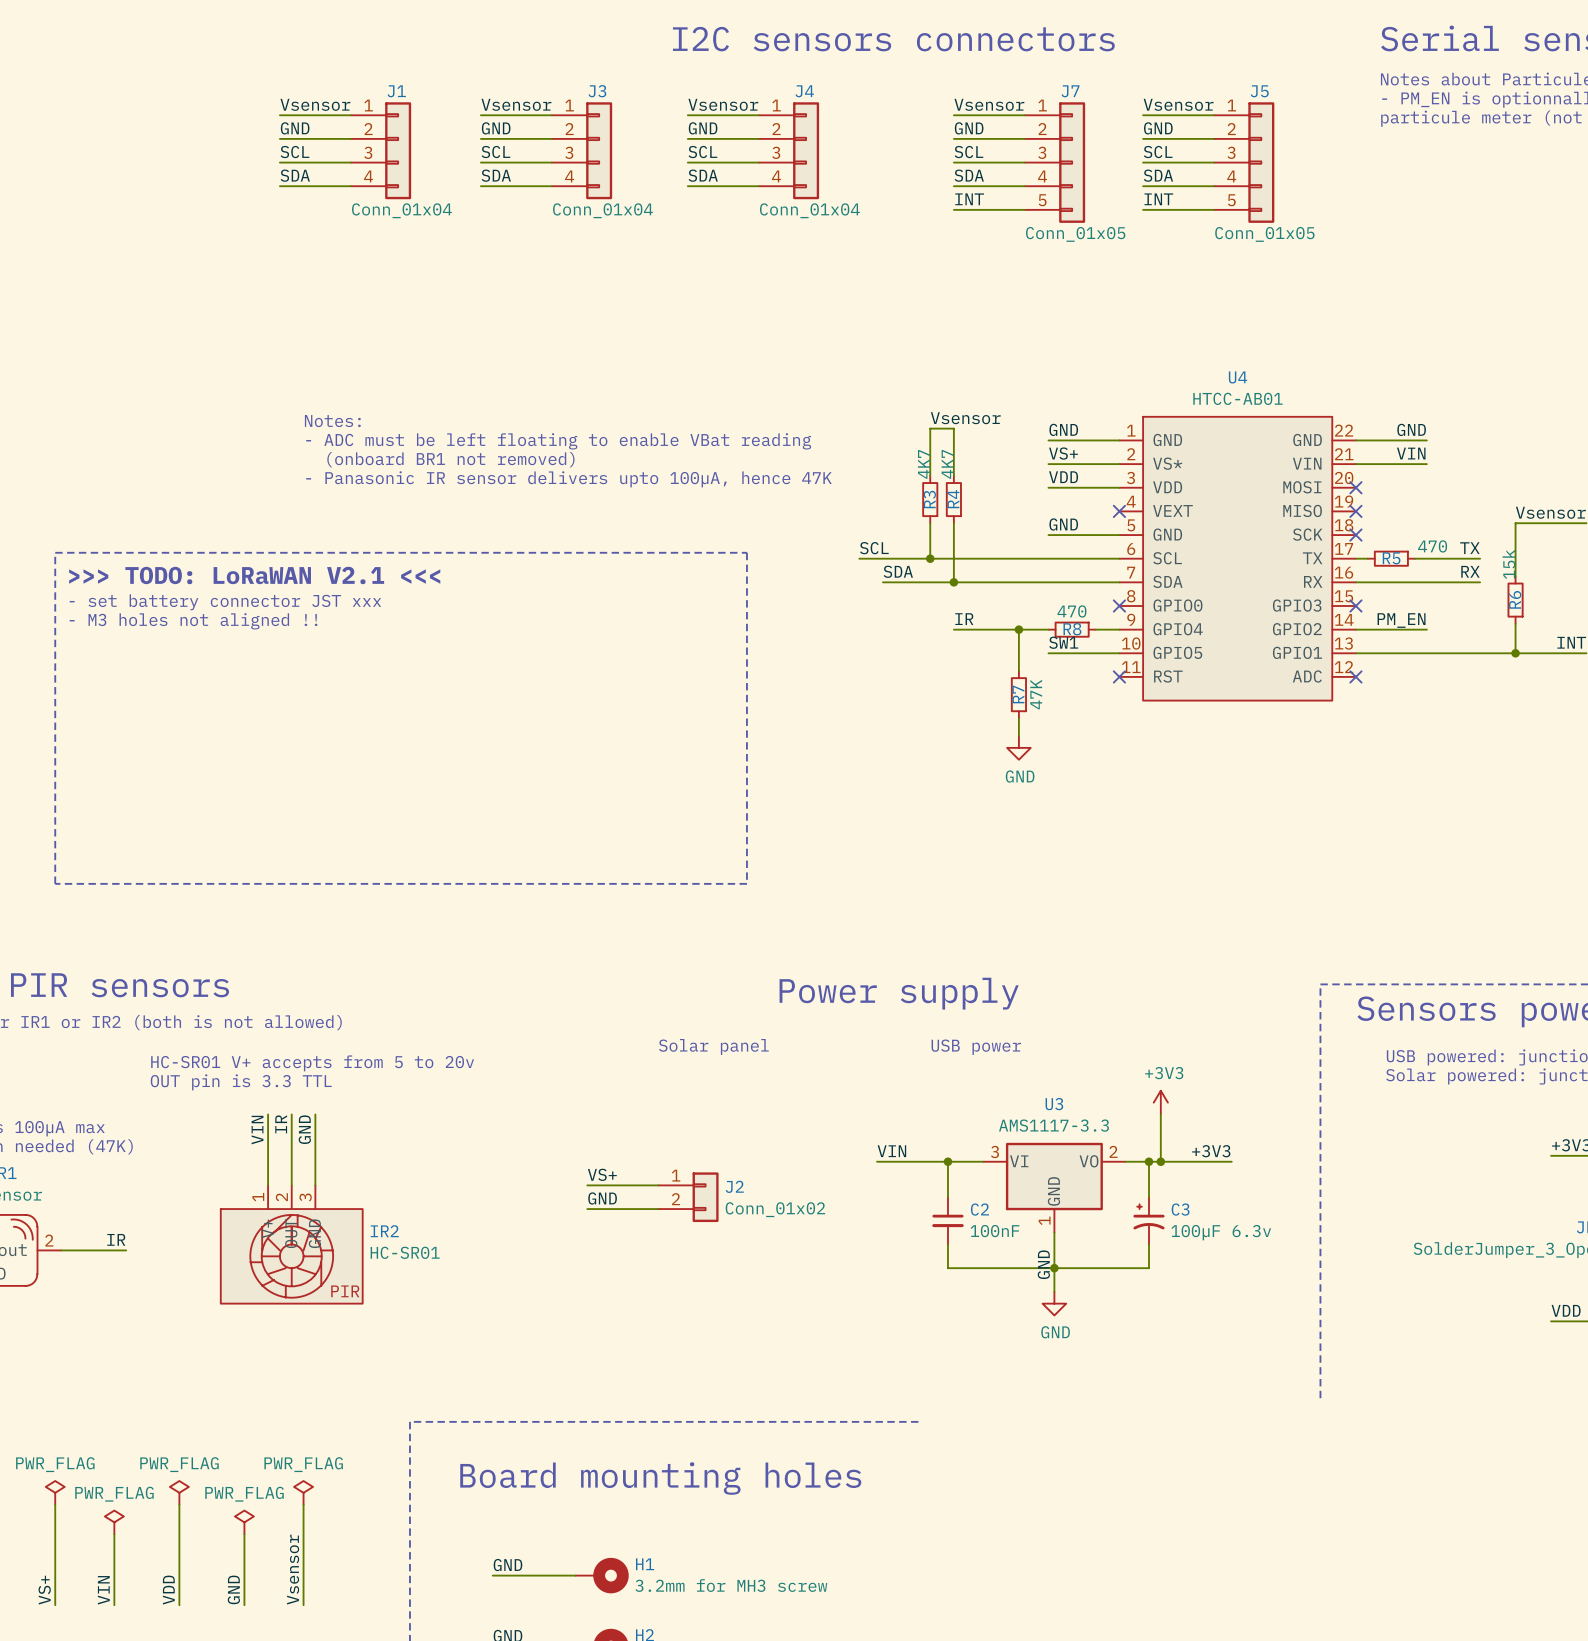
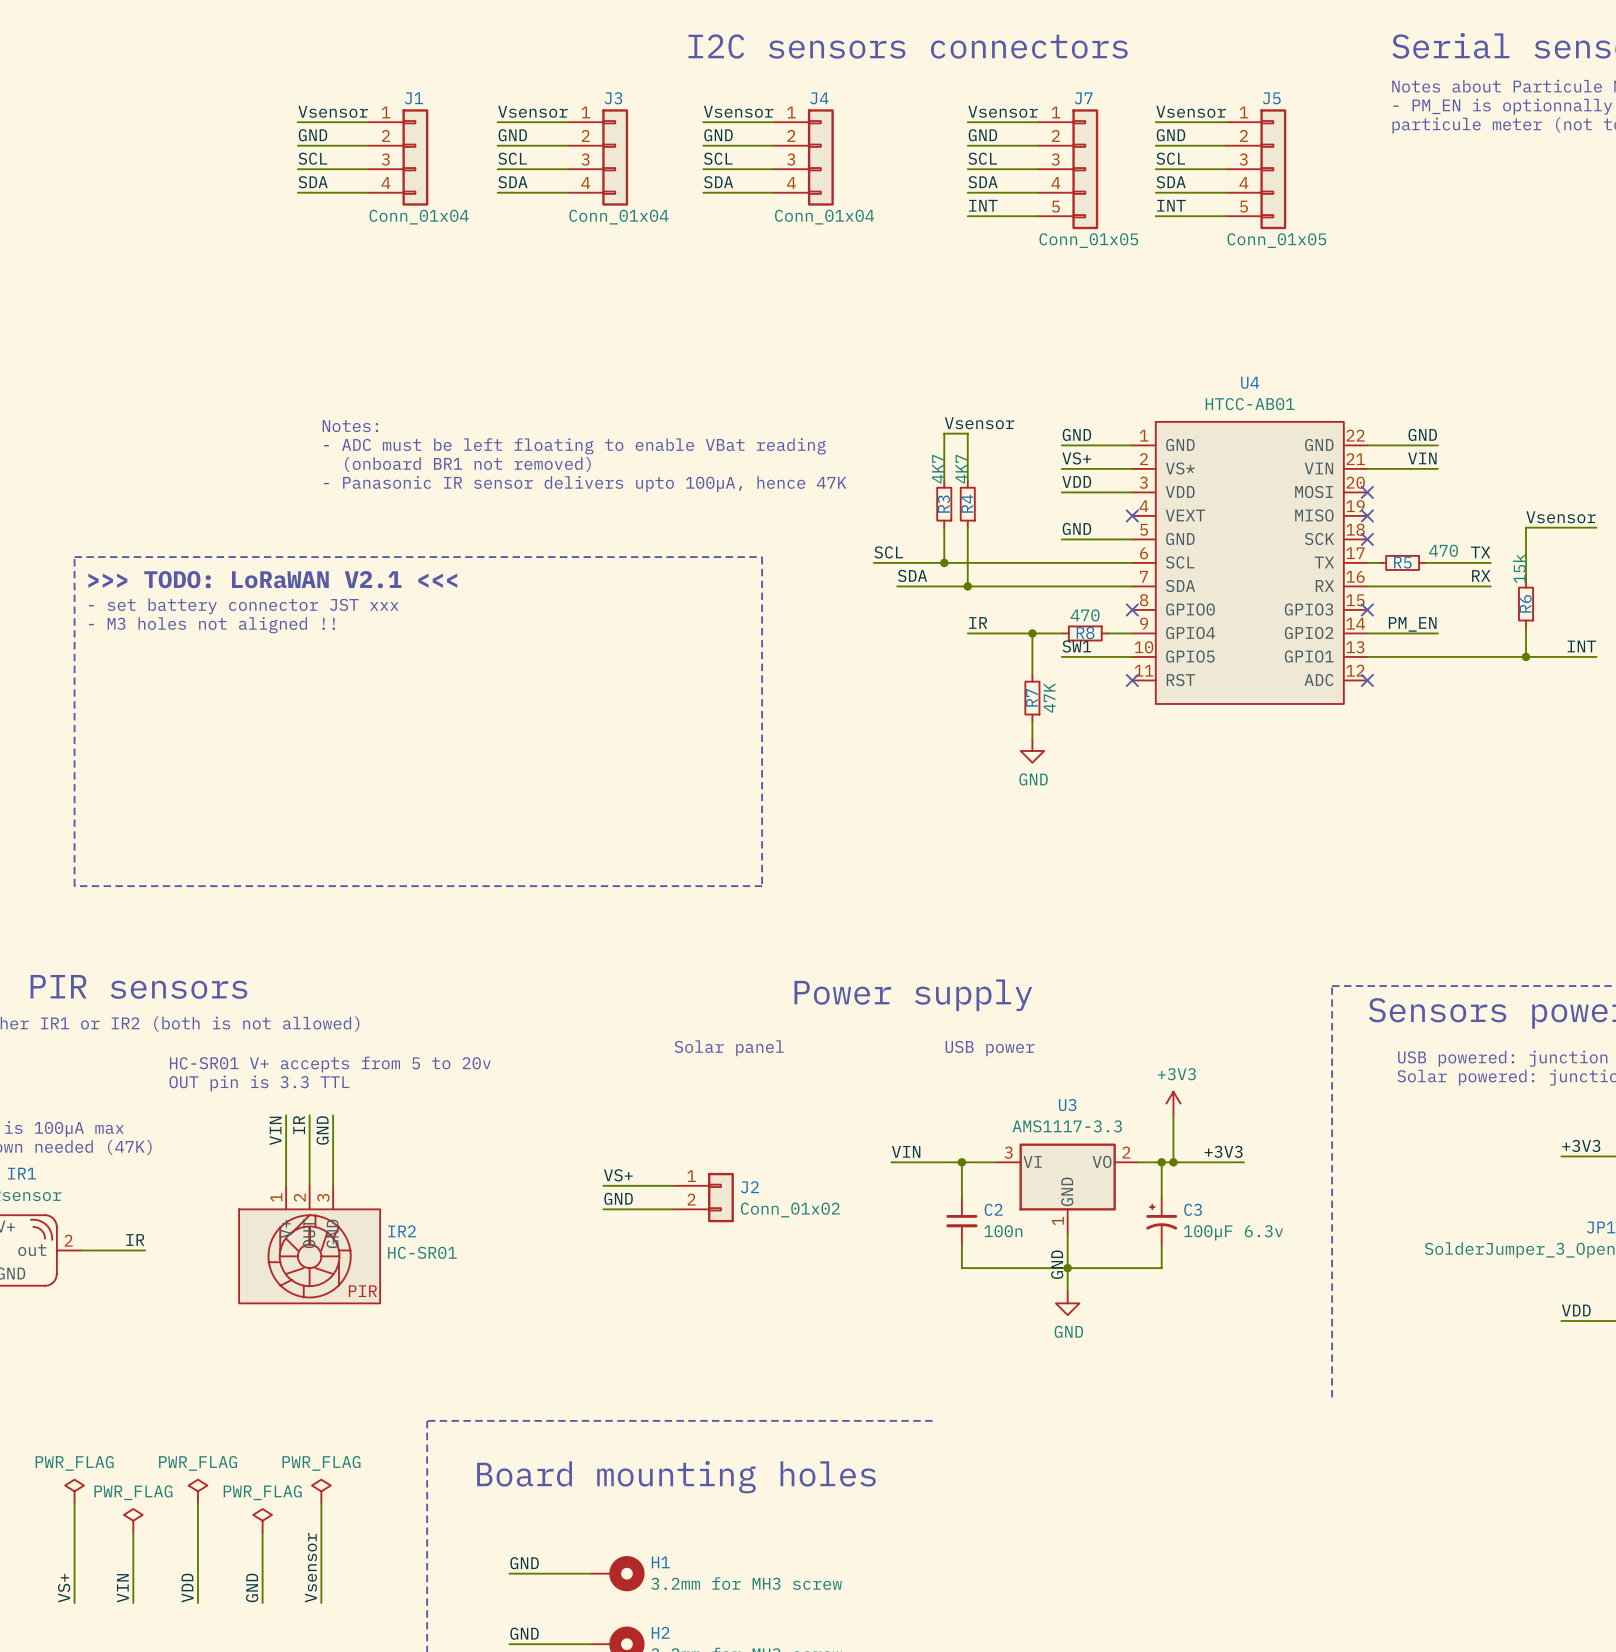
C2 value: 100nF (995, 1231) -> 100n (1003, 1231)

